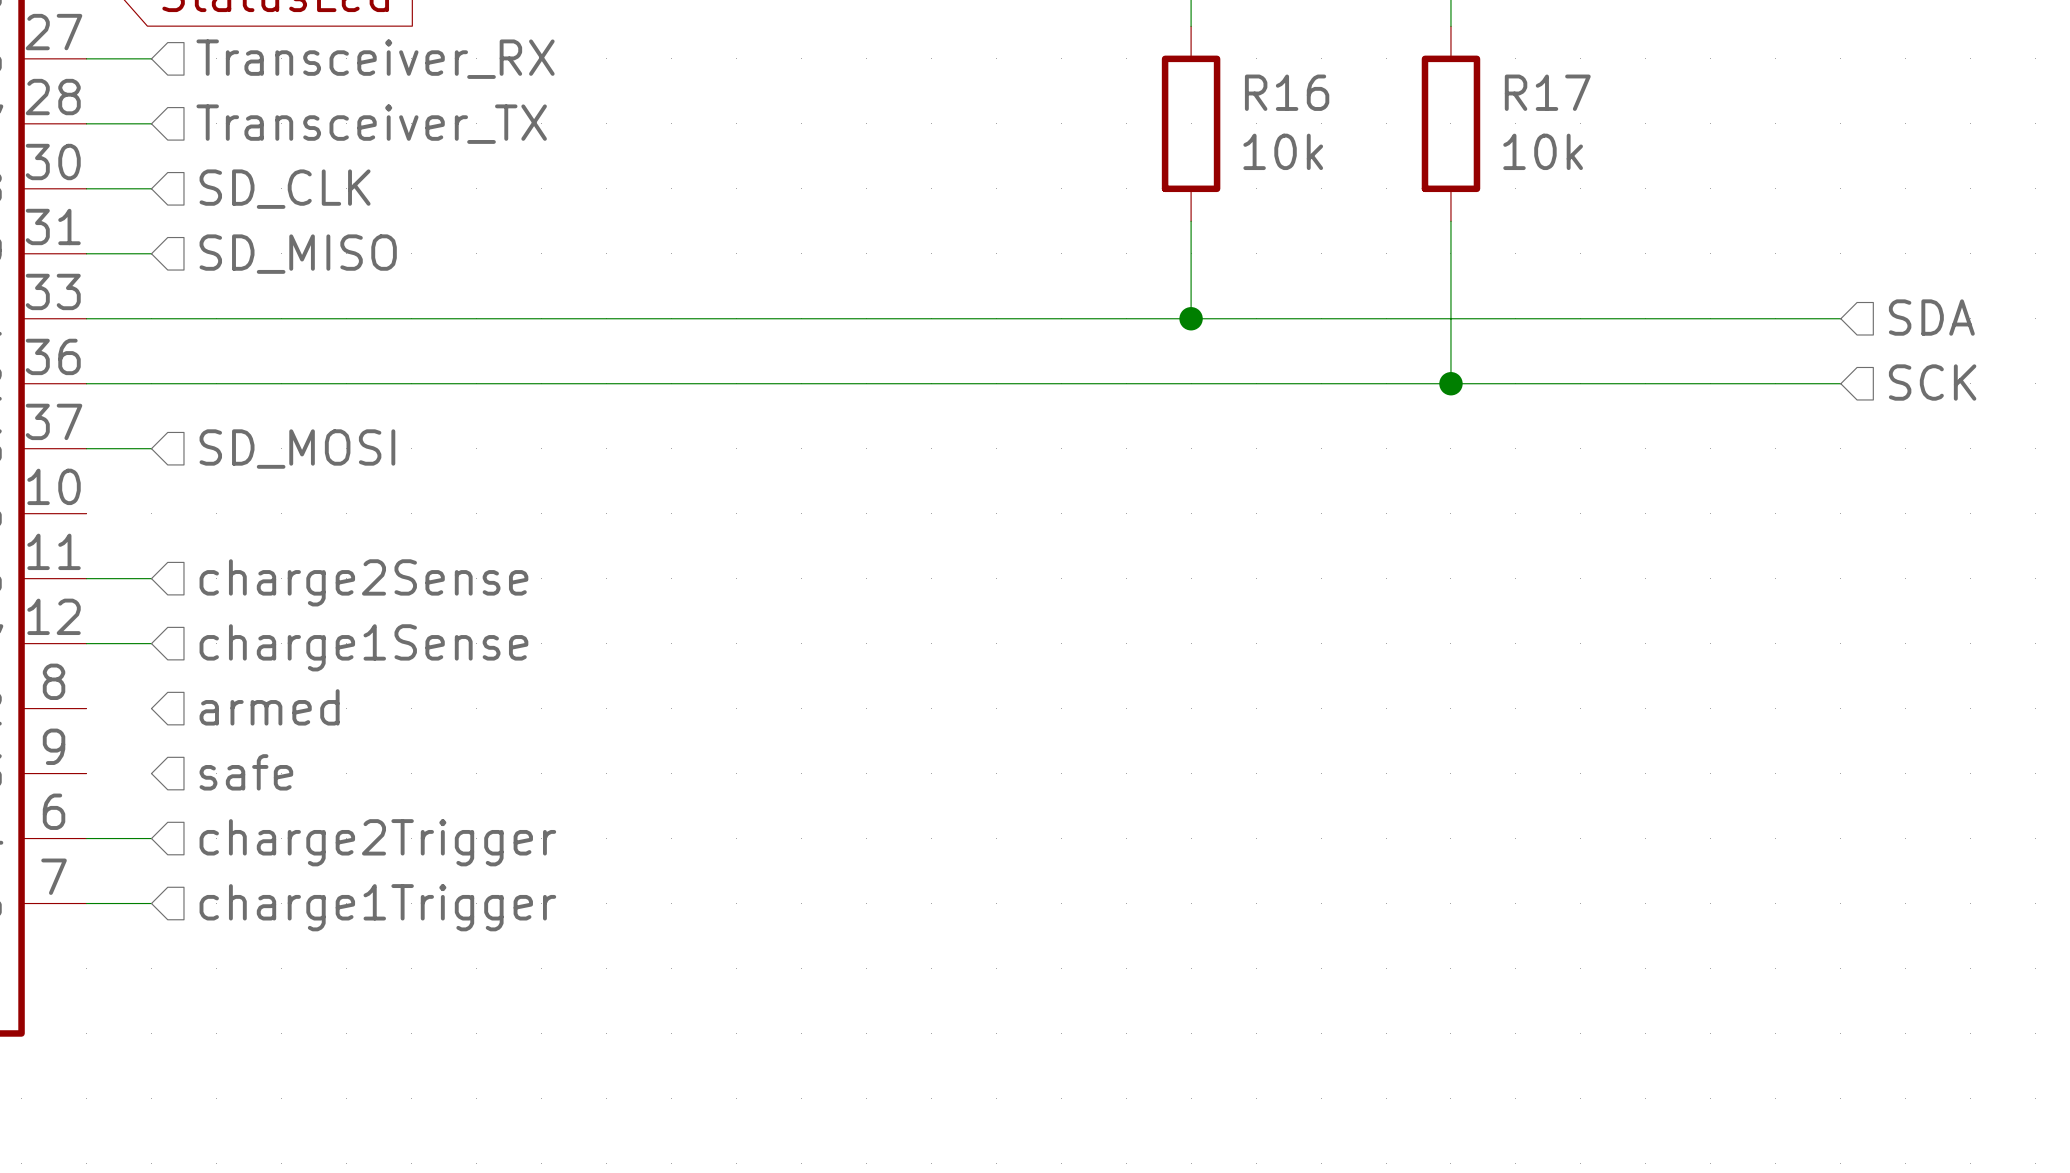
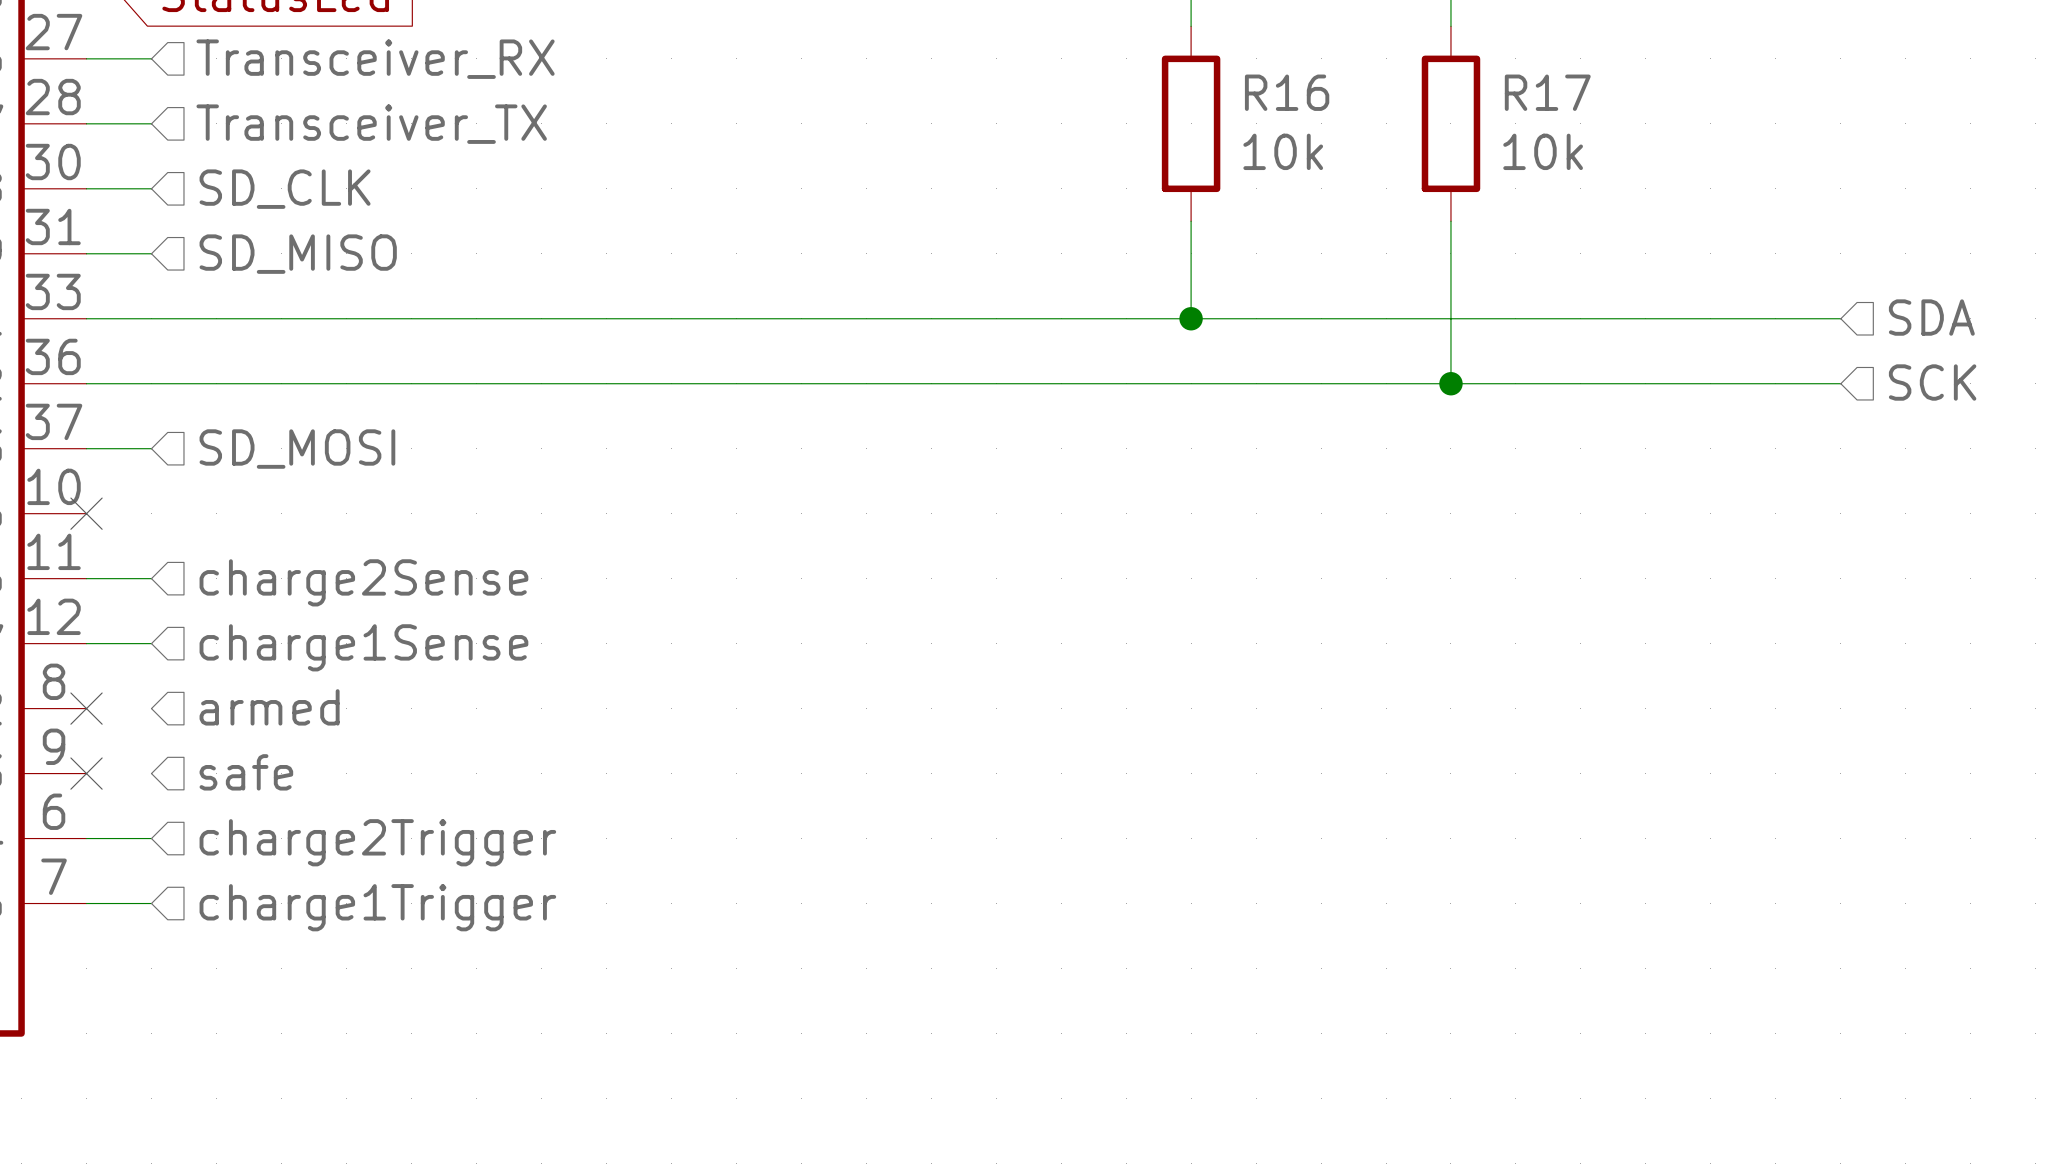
no-connect mark: none -> (86, 513)
no-connect mark: none -> (86, 708)
no-connect mark: none -> (86, 773)

